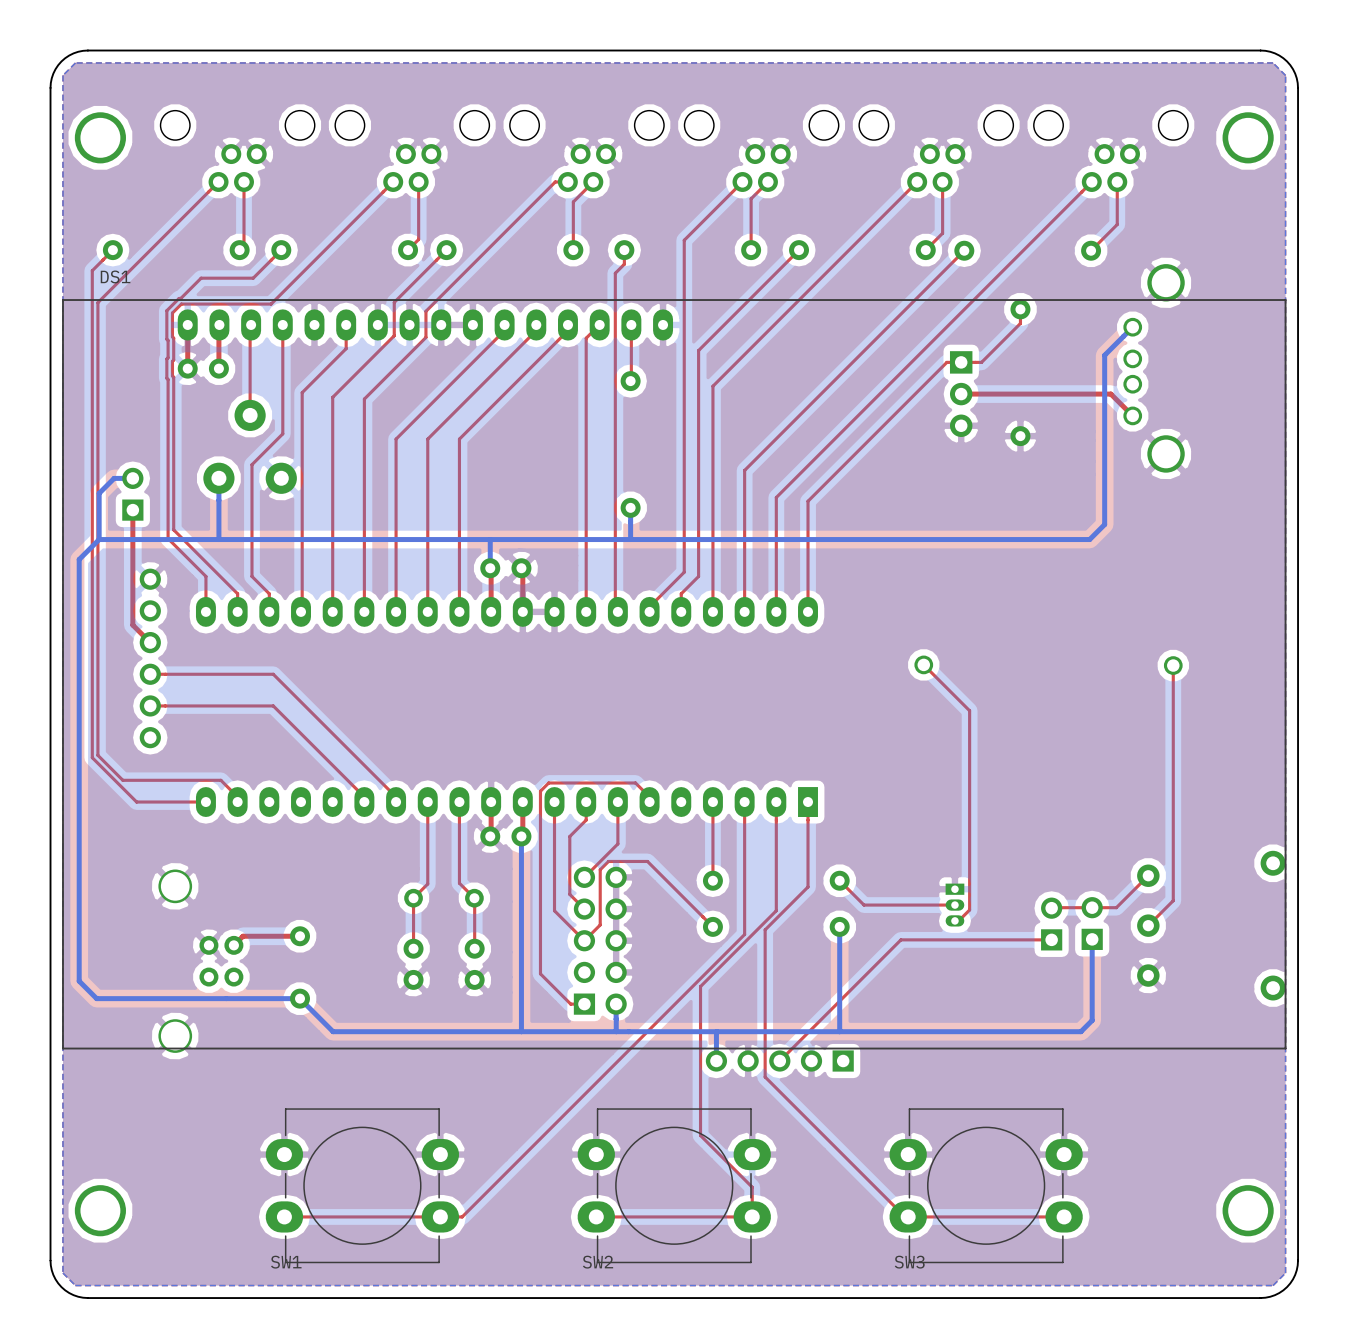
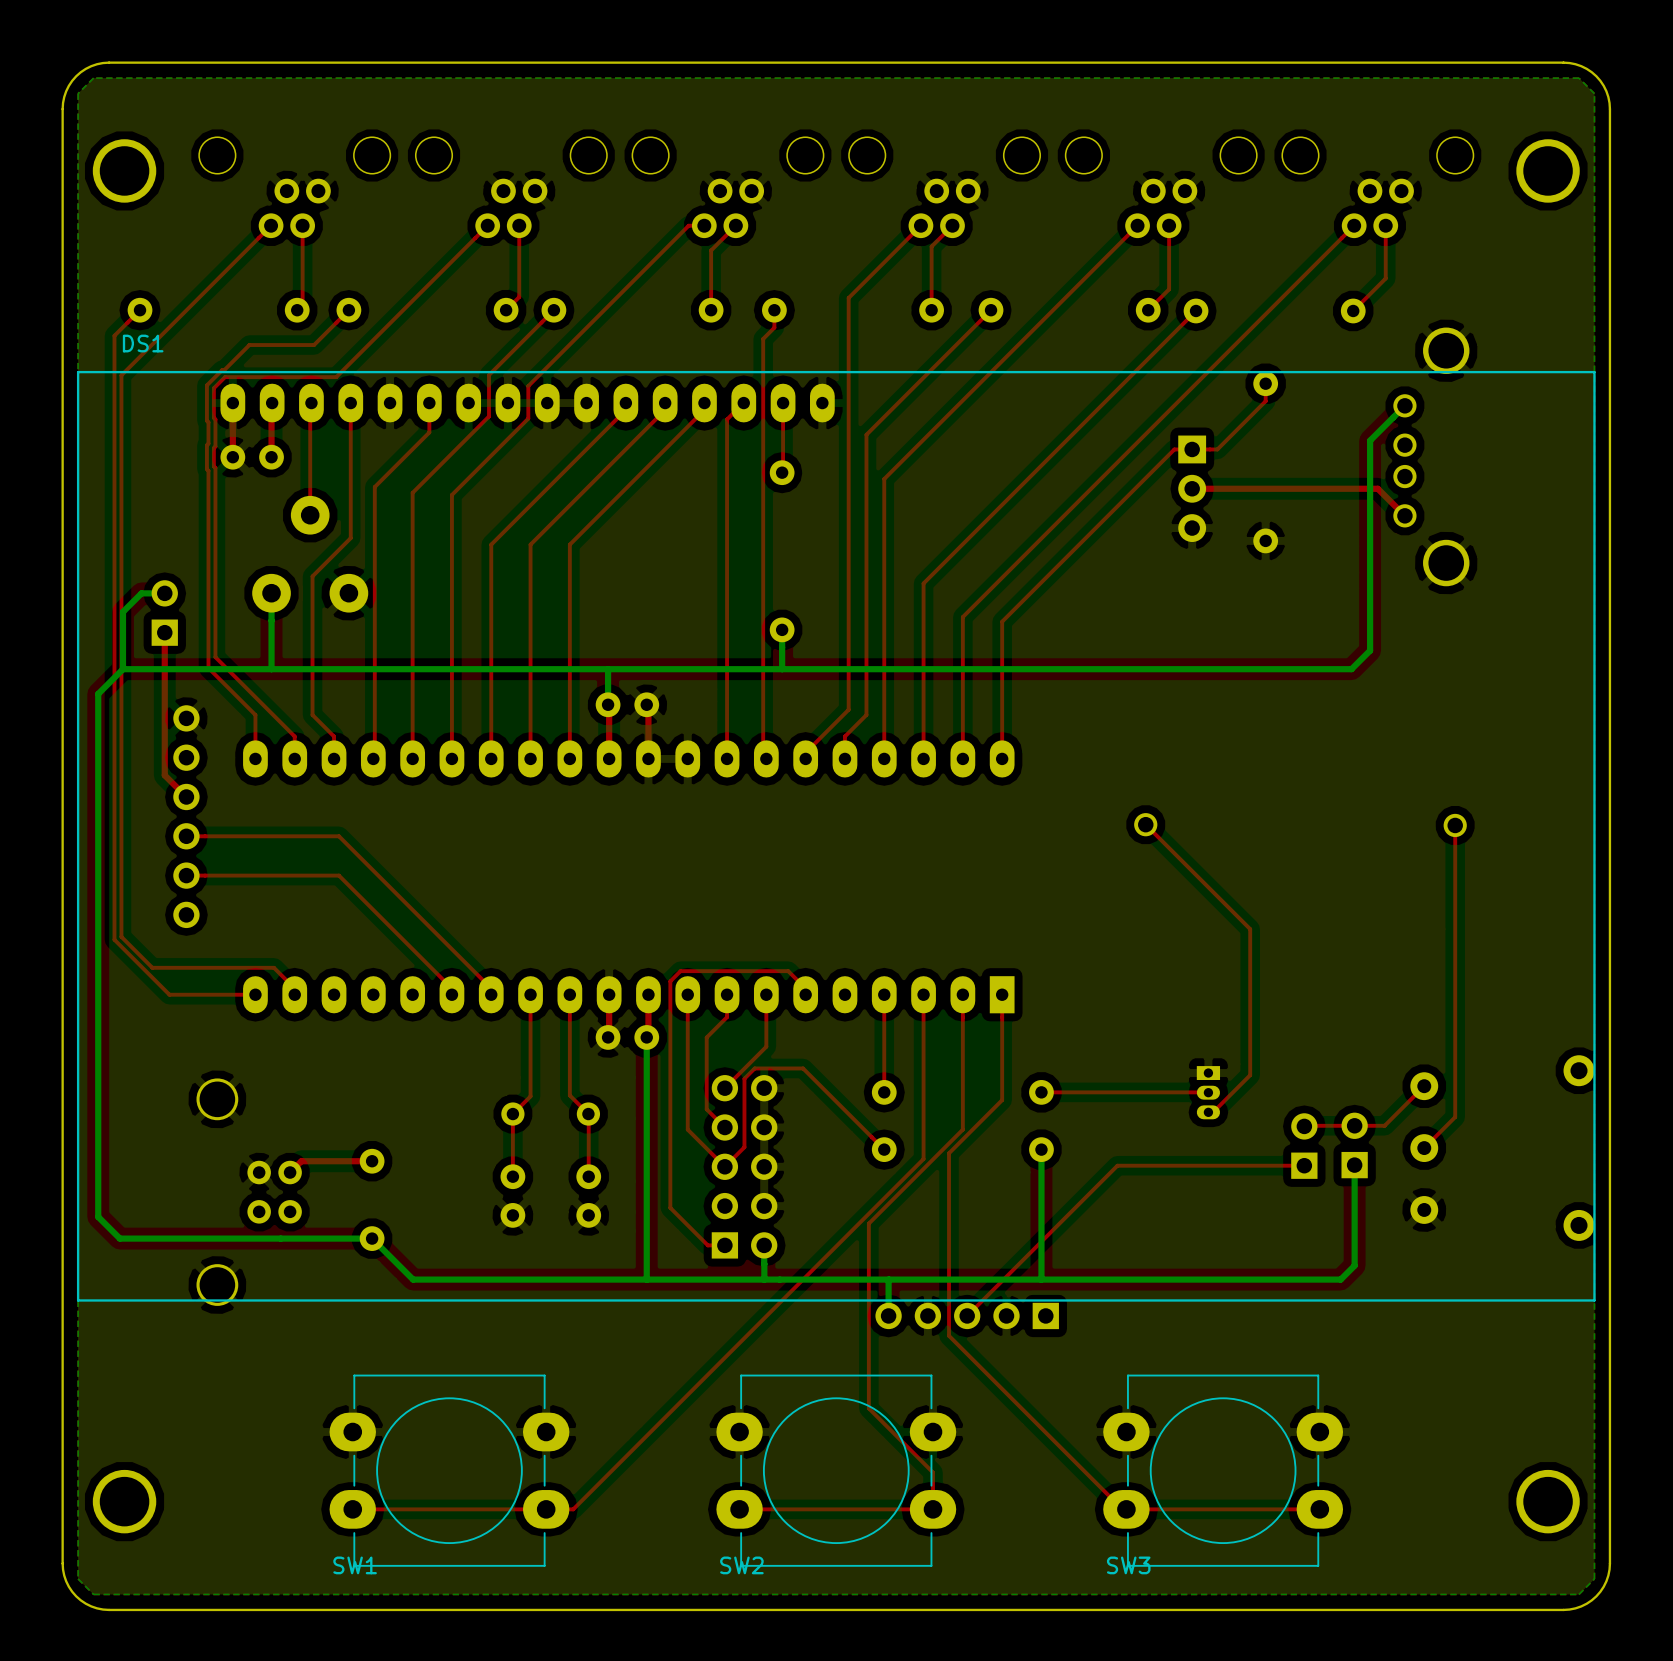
top track: (969, 710) (969, 909) (958, 920) (954, 920) -> (1202, 881) (1250, 929) (1250, 1075) (1213, 1112) (1208, 1112)
top track: (839, 880) (864, 905) (954, 905) -> (1041, 1092) (1208, 1092)
part position: (954, 905) -> (1208, 1092)

